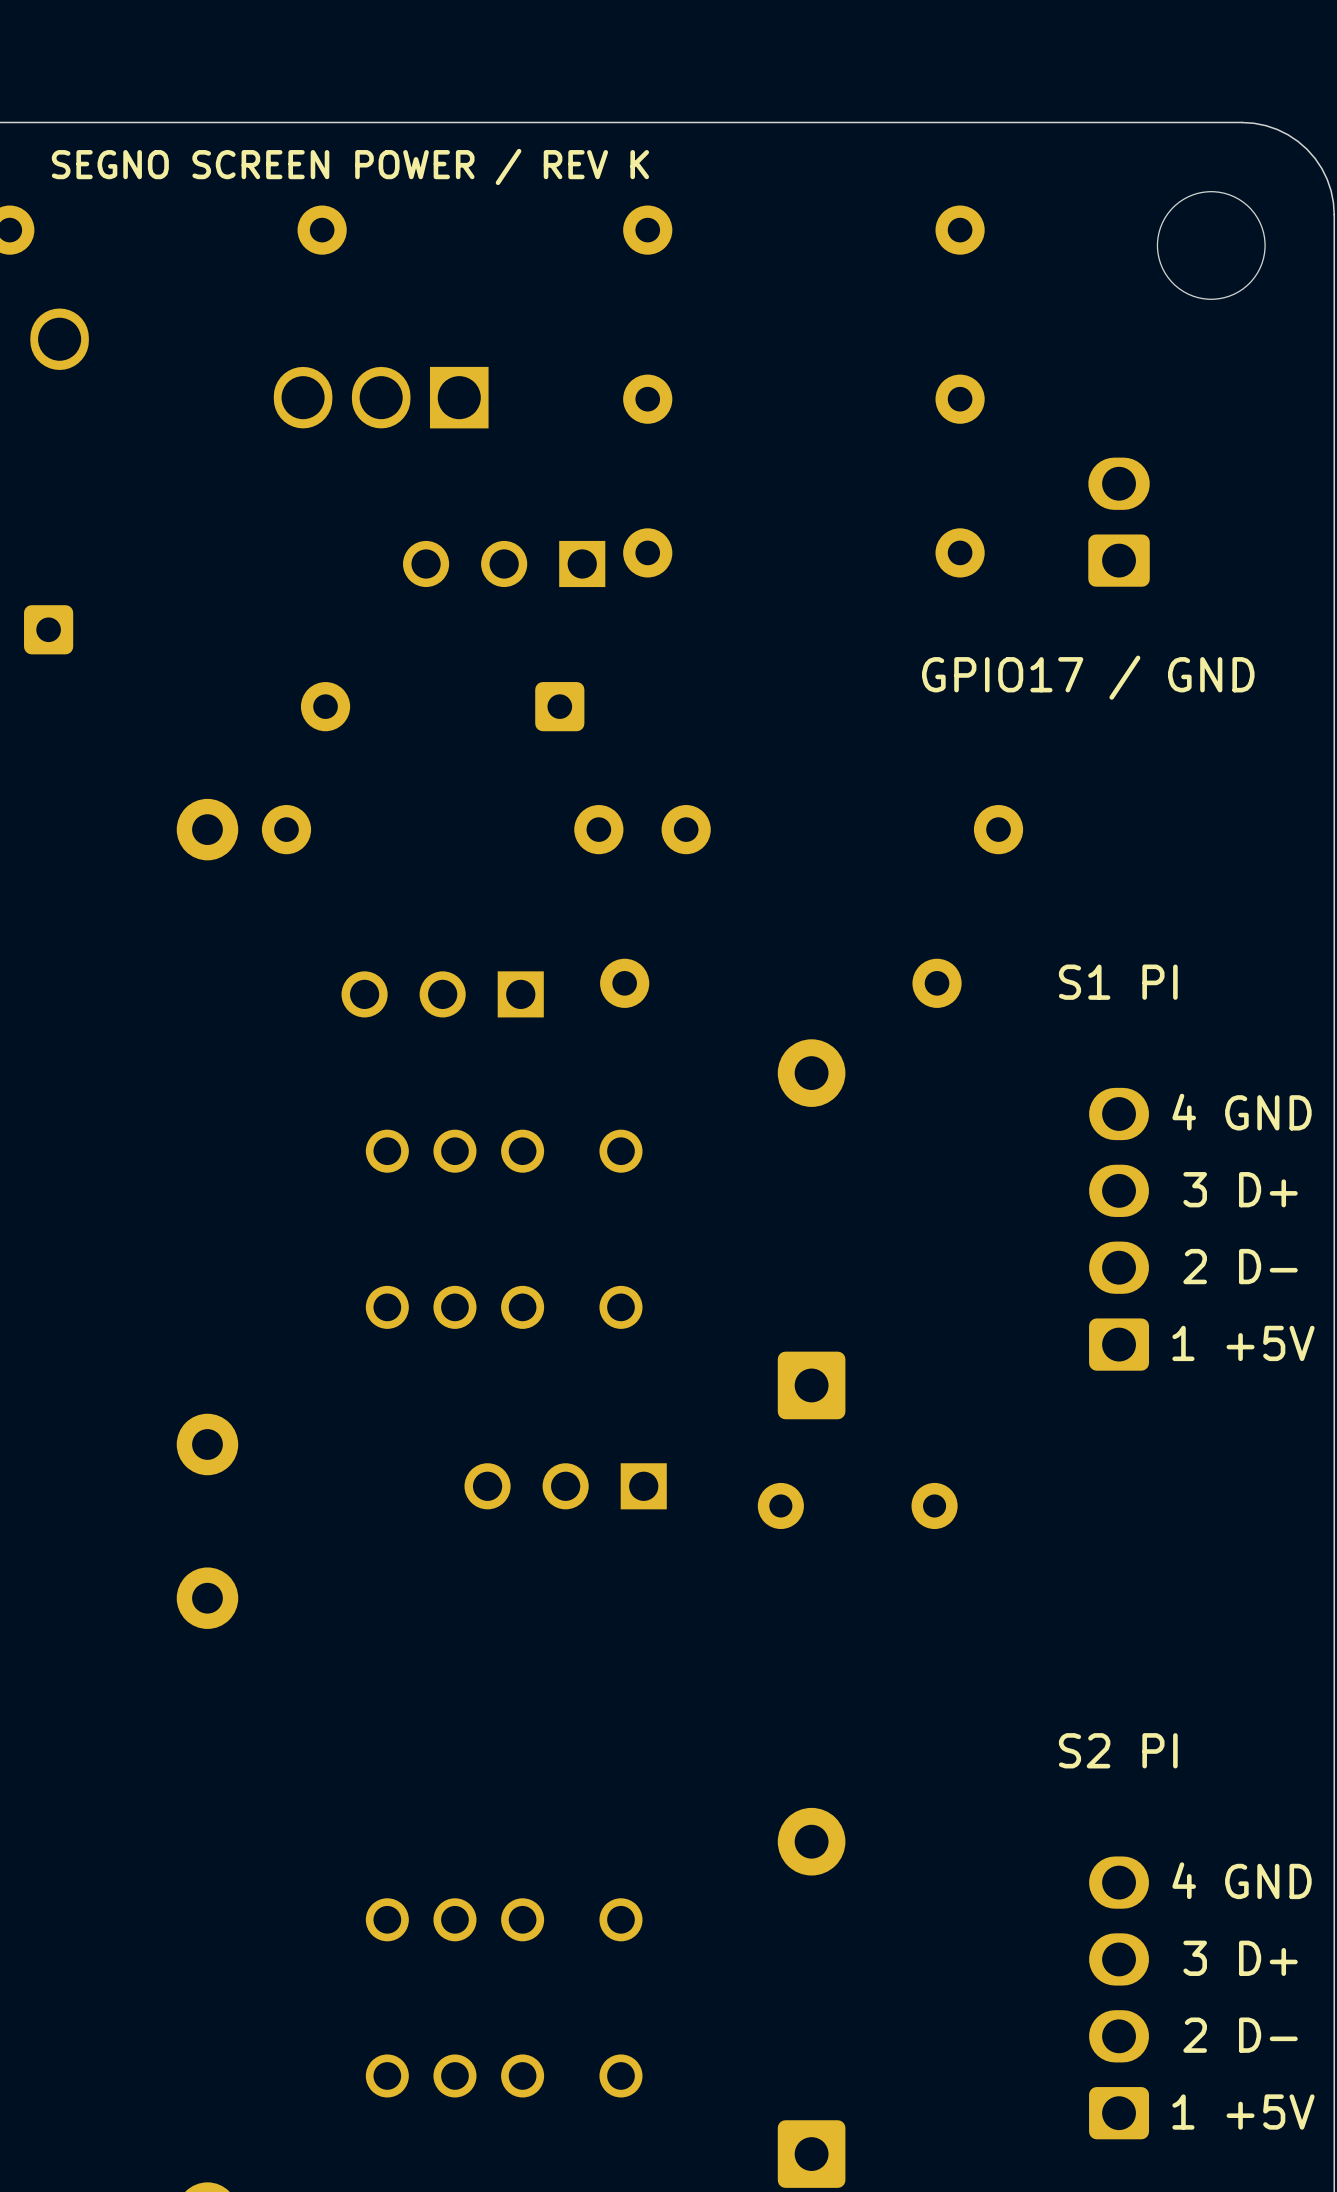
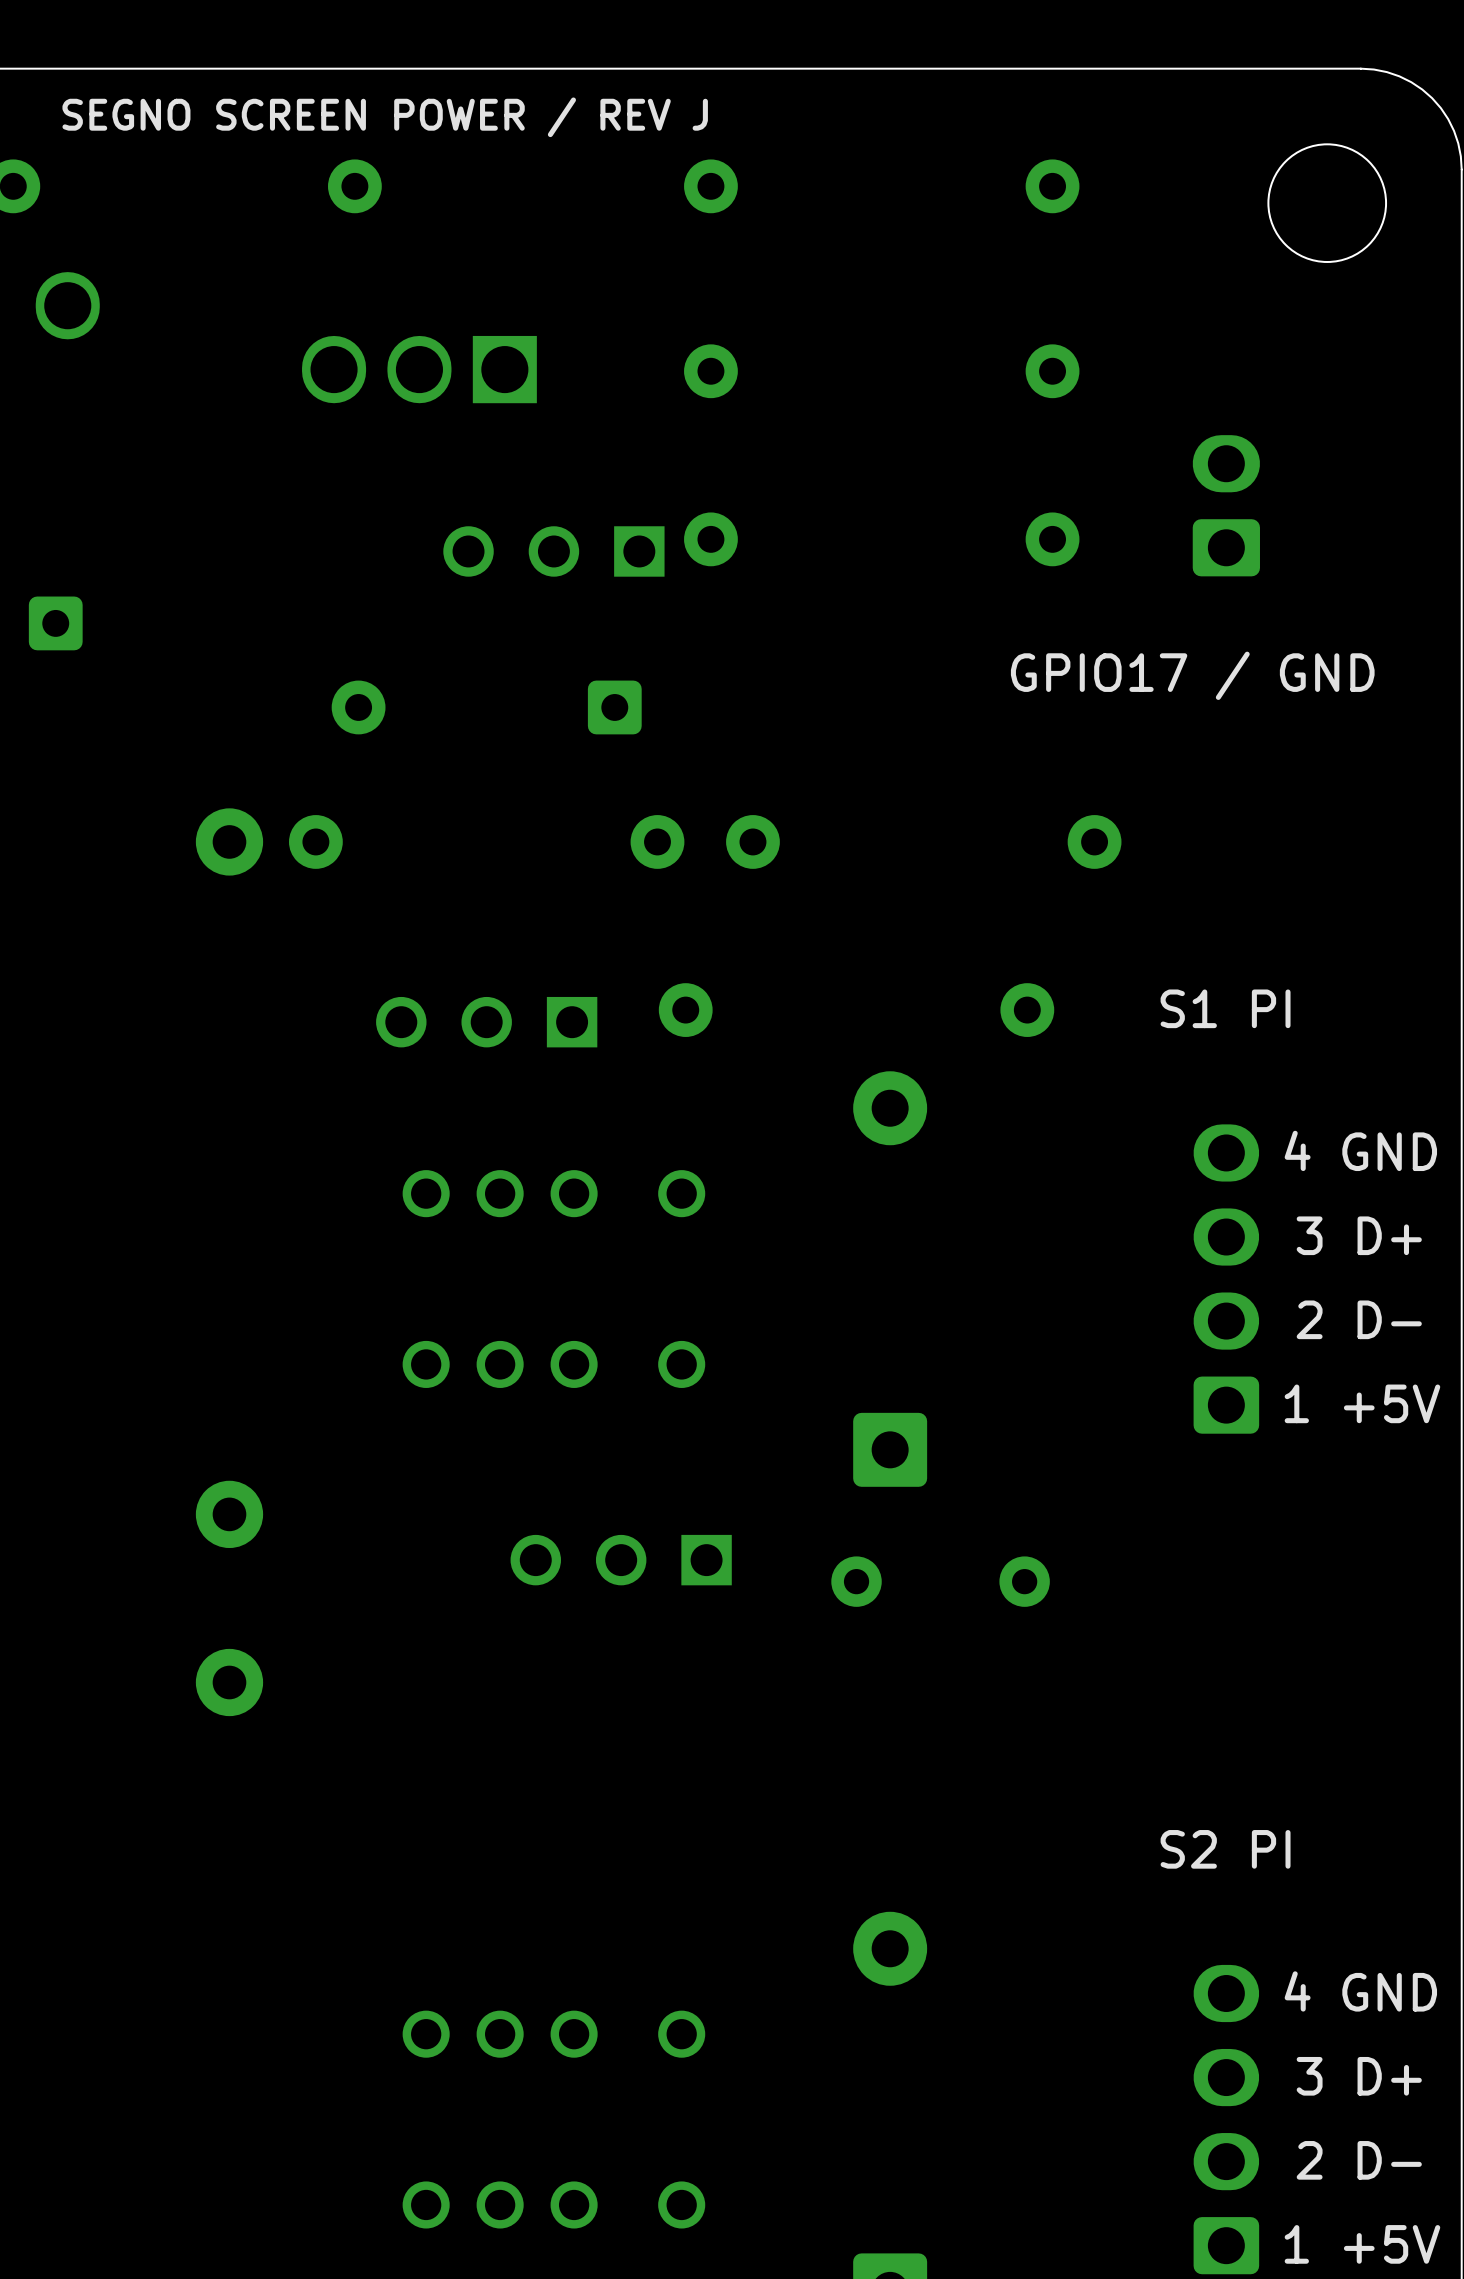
text: SEGNO SCREEN POWER / REV K (350, 166) -> SEGNO SCREEN POWER / REV J (385, 117)

